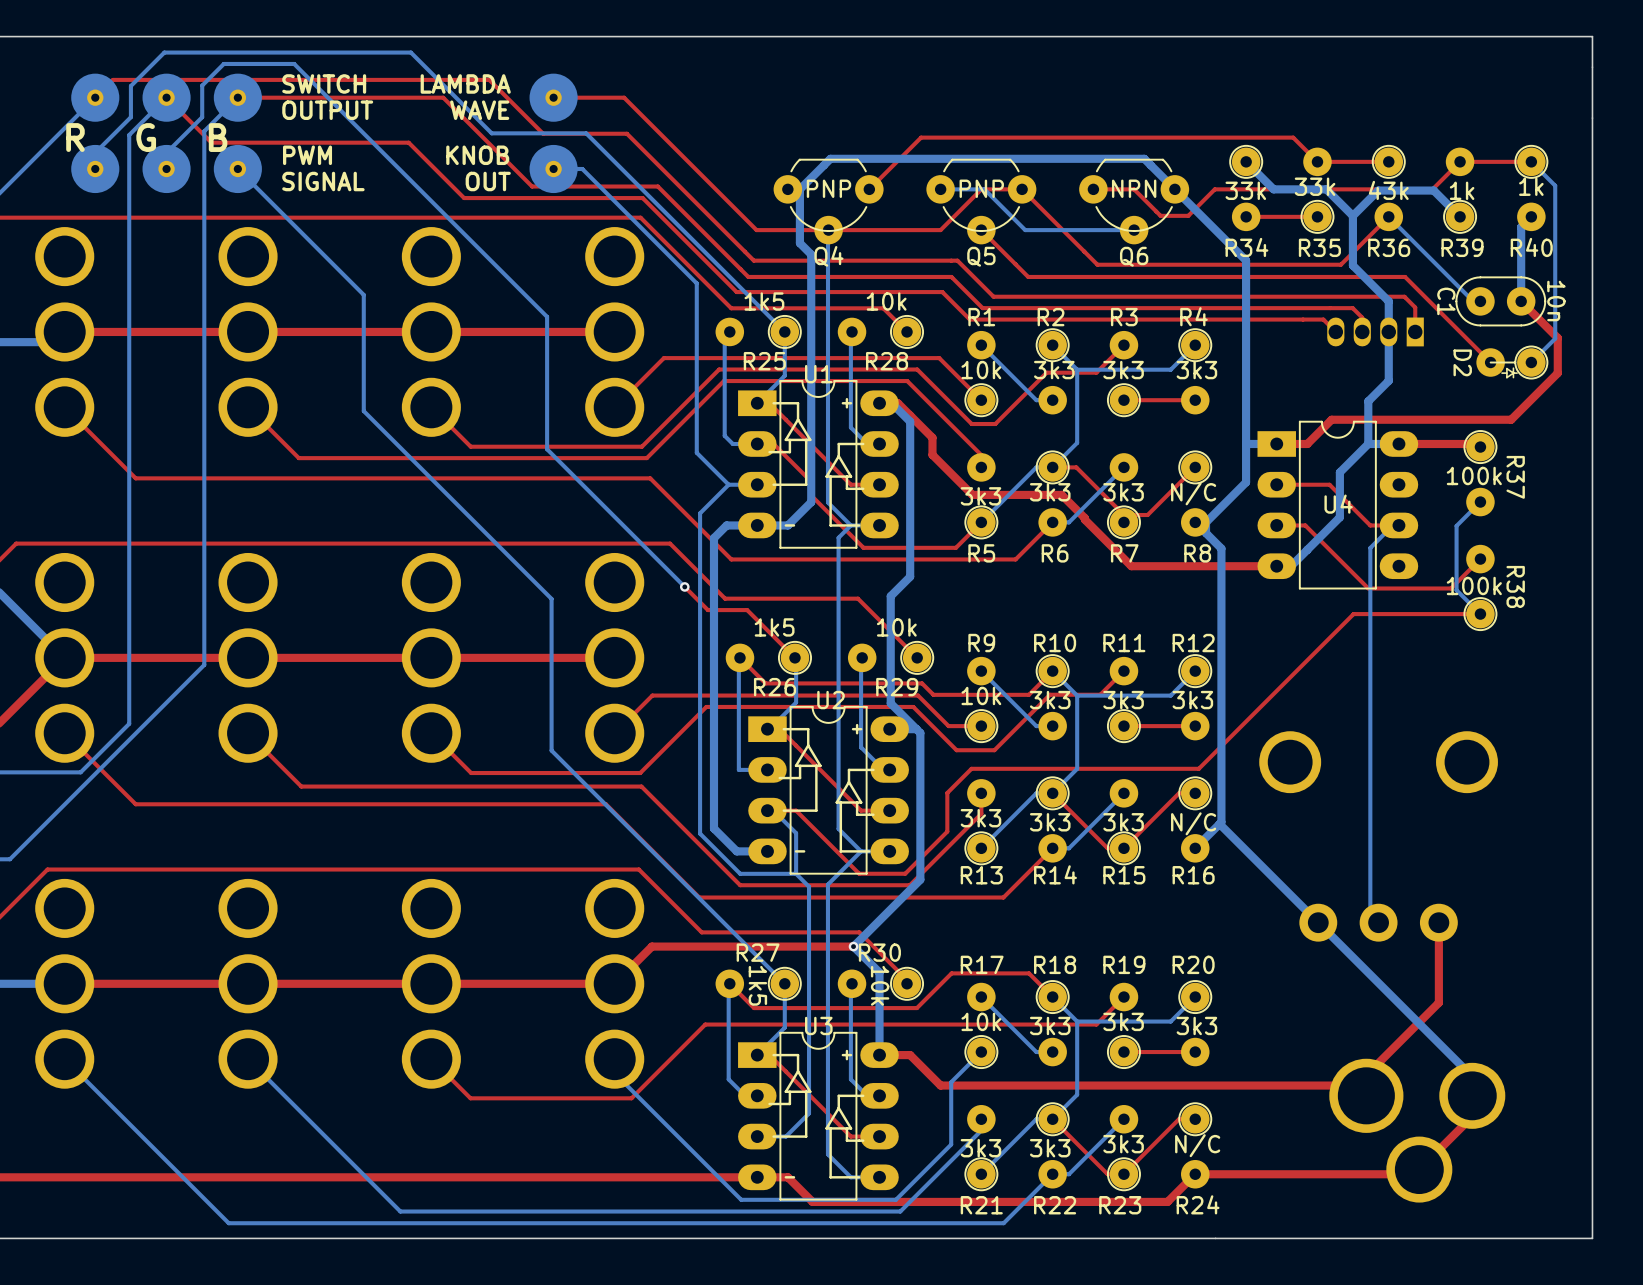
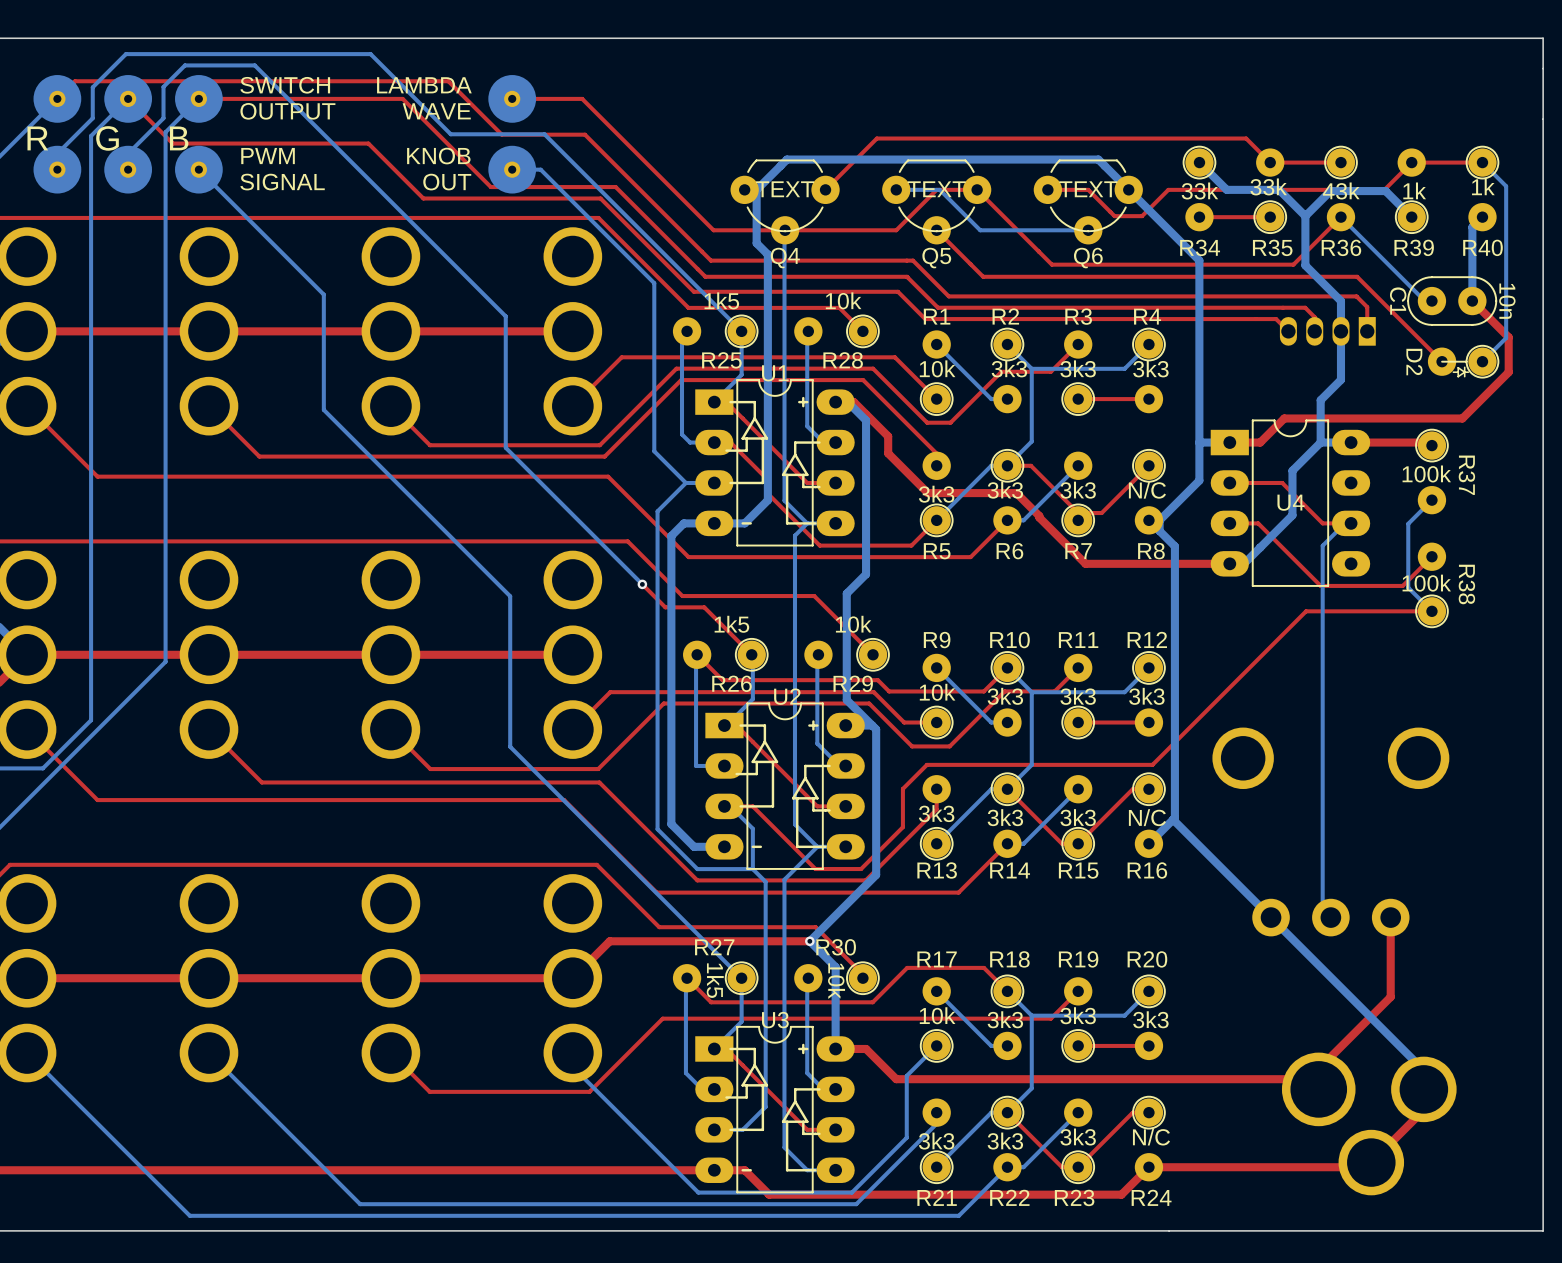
Q4 text: PNP (828, 188) -> TEXT (785, 189)
Q5 text: PNP (981, 188) -> TEXT (936, 189)
Q6 text: NPN (1134, 188) -> TEXT (1088, 189)

